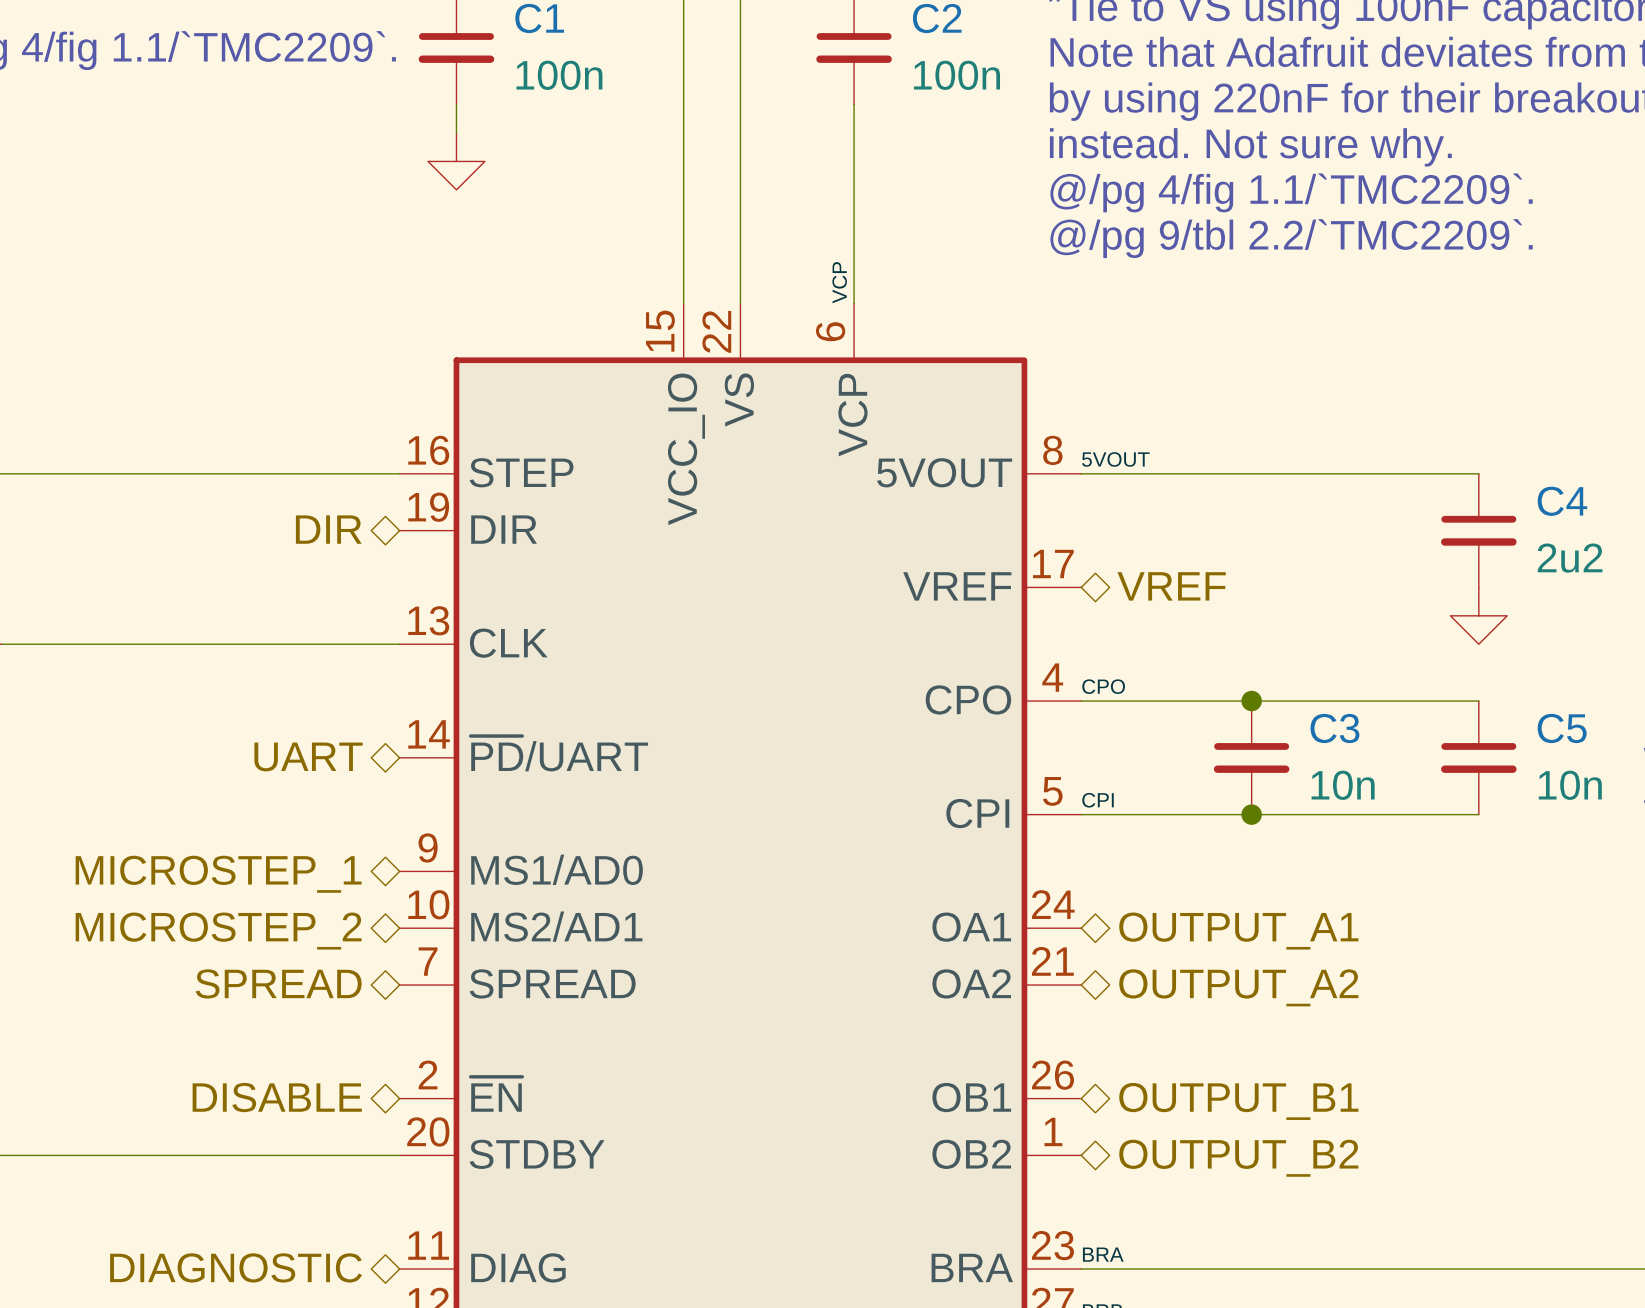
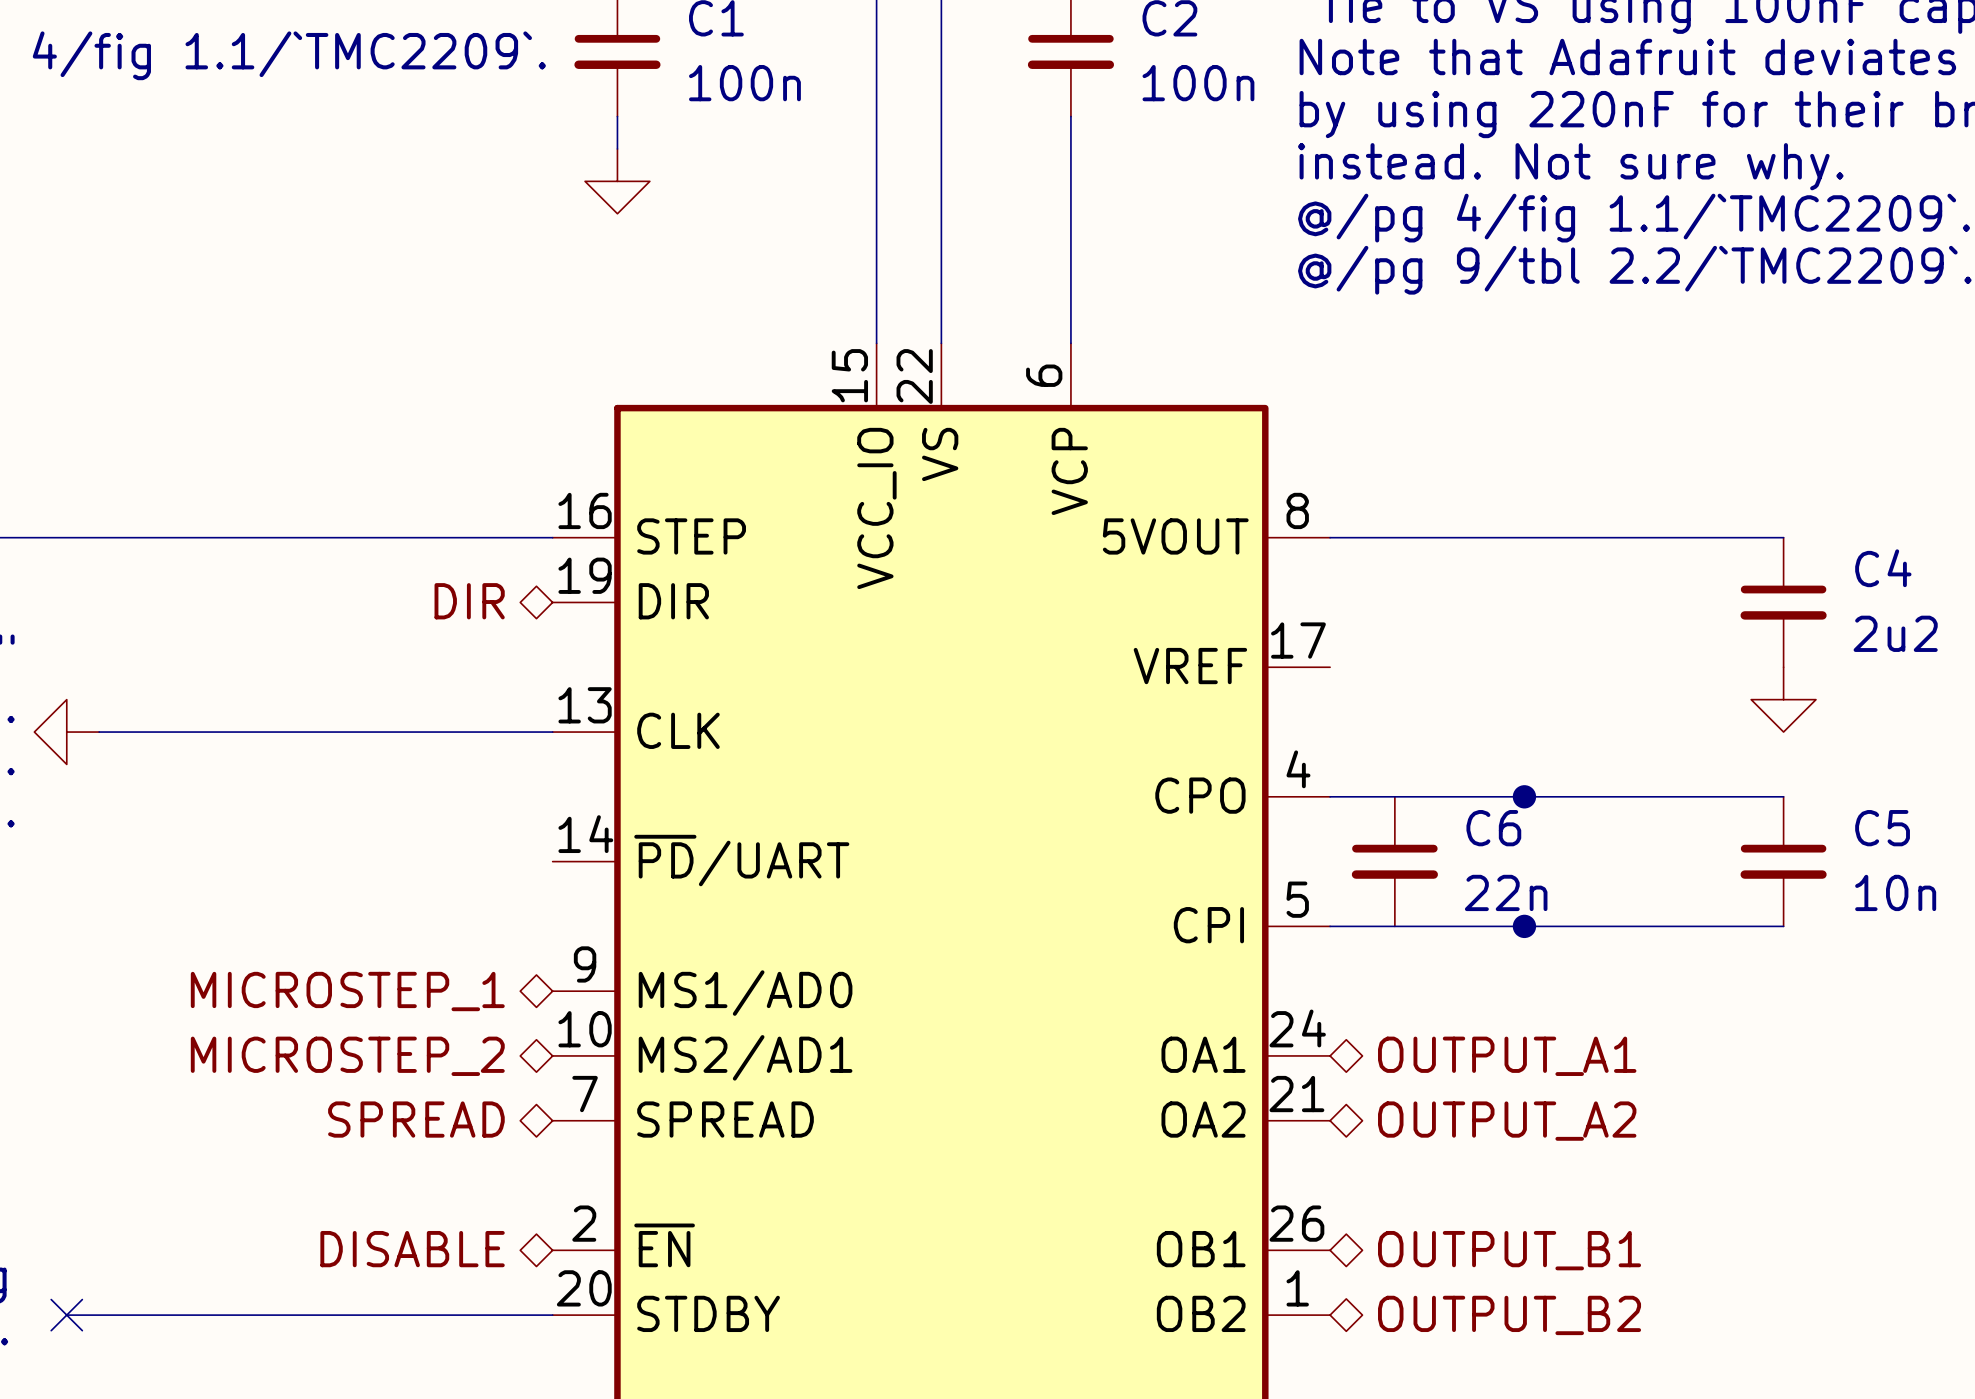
label: VCP (839, 282) -> none
label: 5VOUT (1115, 459) -> none
hierarchical label: VREF (1171, 586) -> none
label: CPO (1103, 686) -> none
hierarchical label: UART (308, 756) -> none
C6: none -> 22n (1394, 861)
C3: 10n (1251, 757) -> none
label: CPI (1098, 800) -> none

